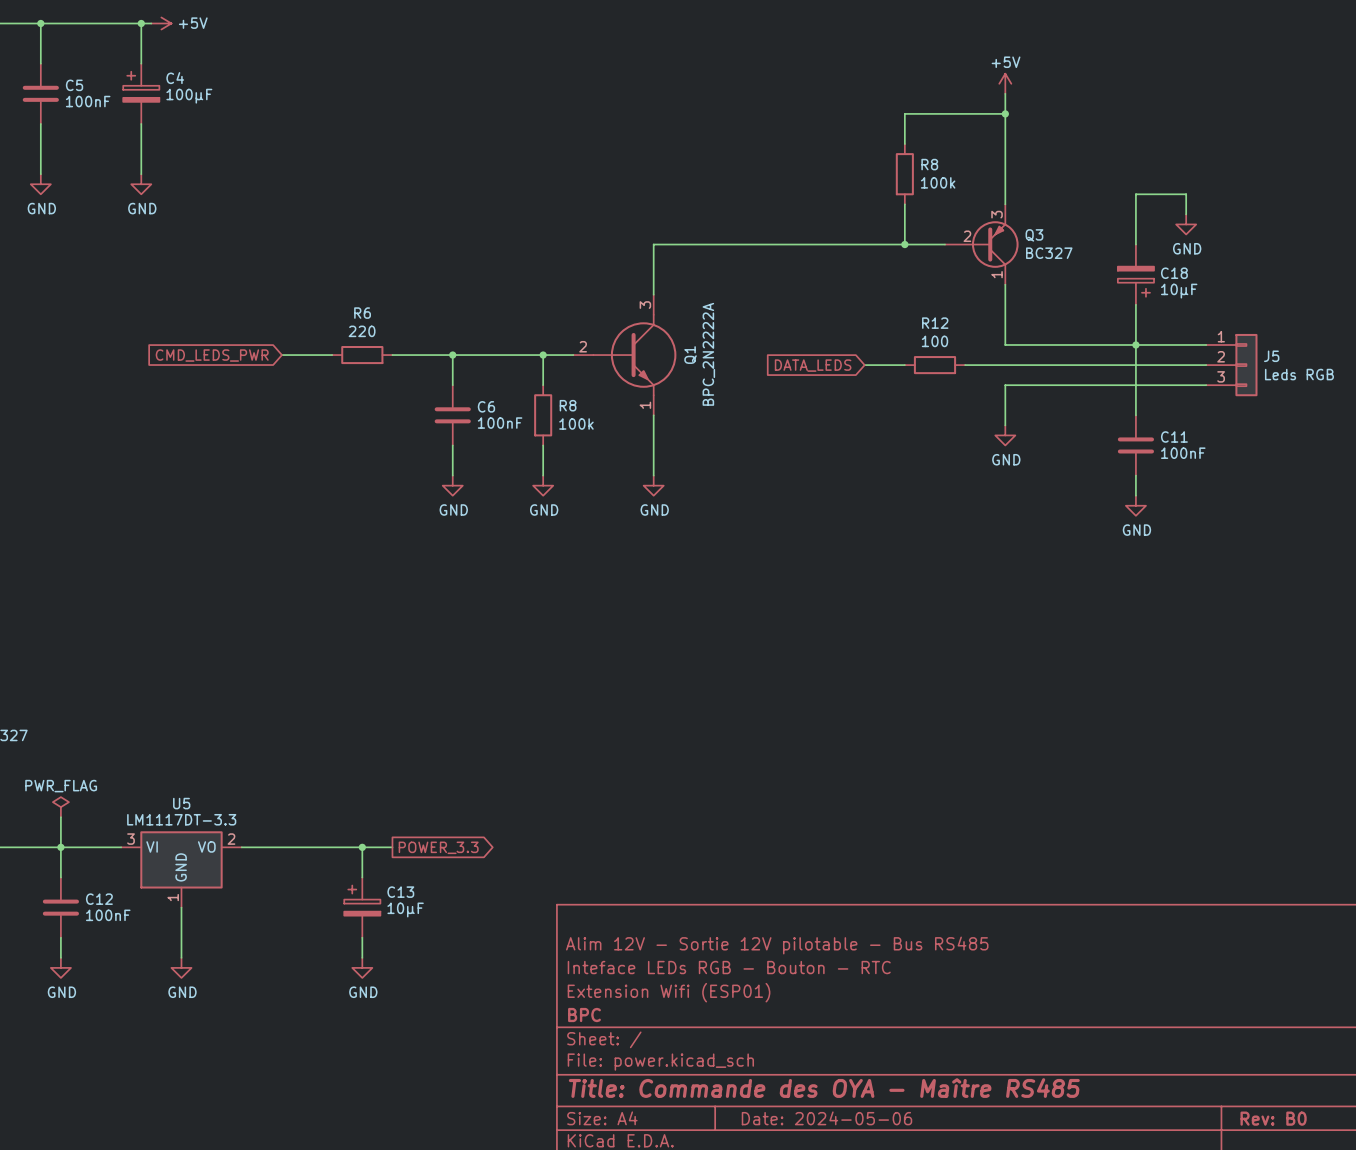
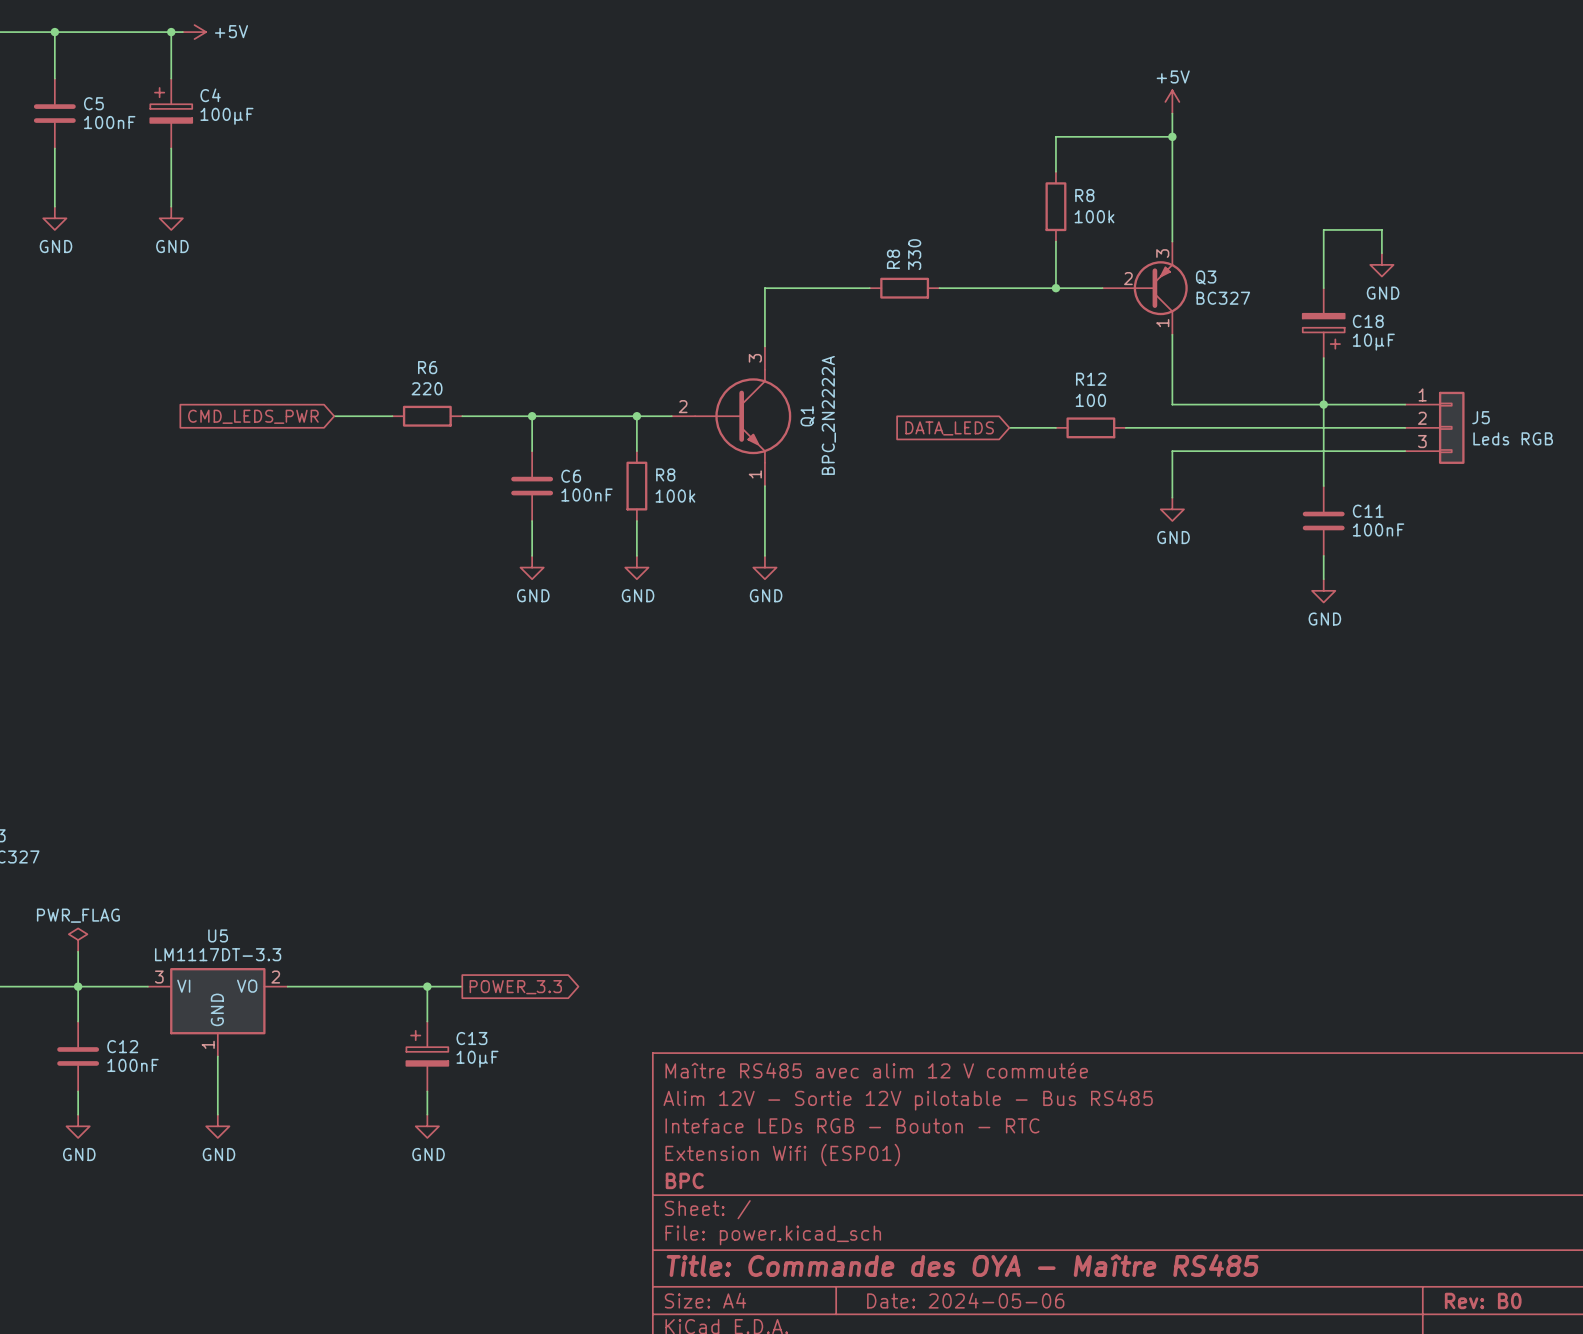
wire: (744, 244) (804, 244) -> none
R8: none -> 330 (904, 288)
title block: none -> Maître RS485 avec alim 12 V commutée (876, 1070)

